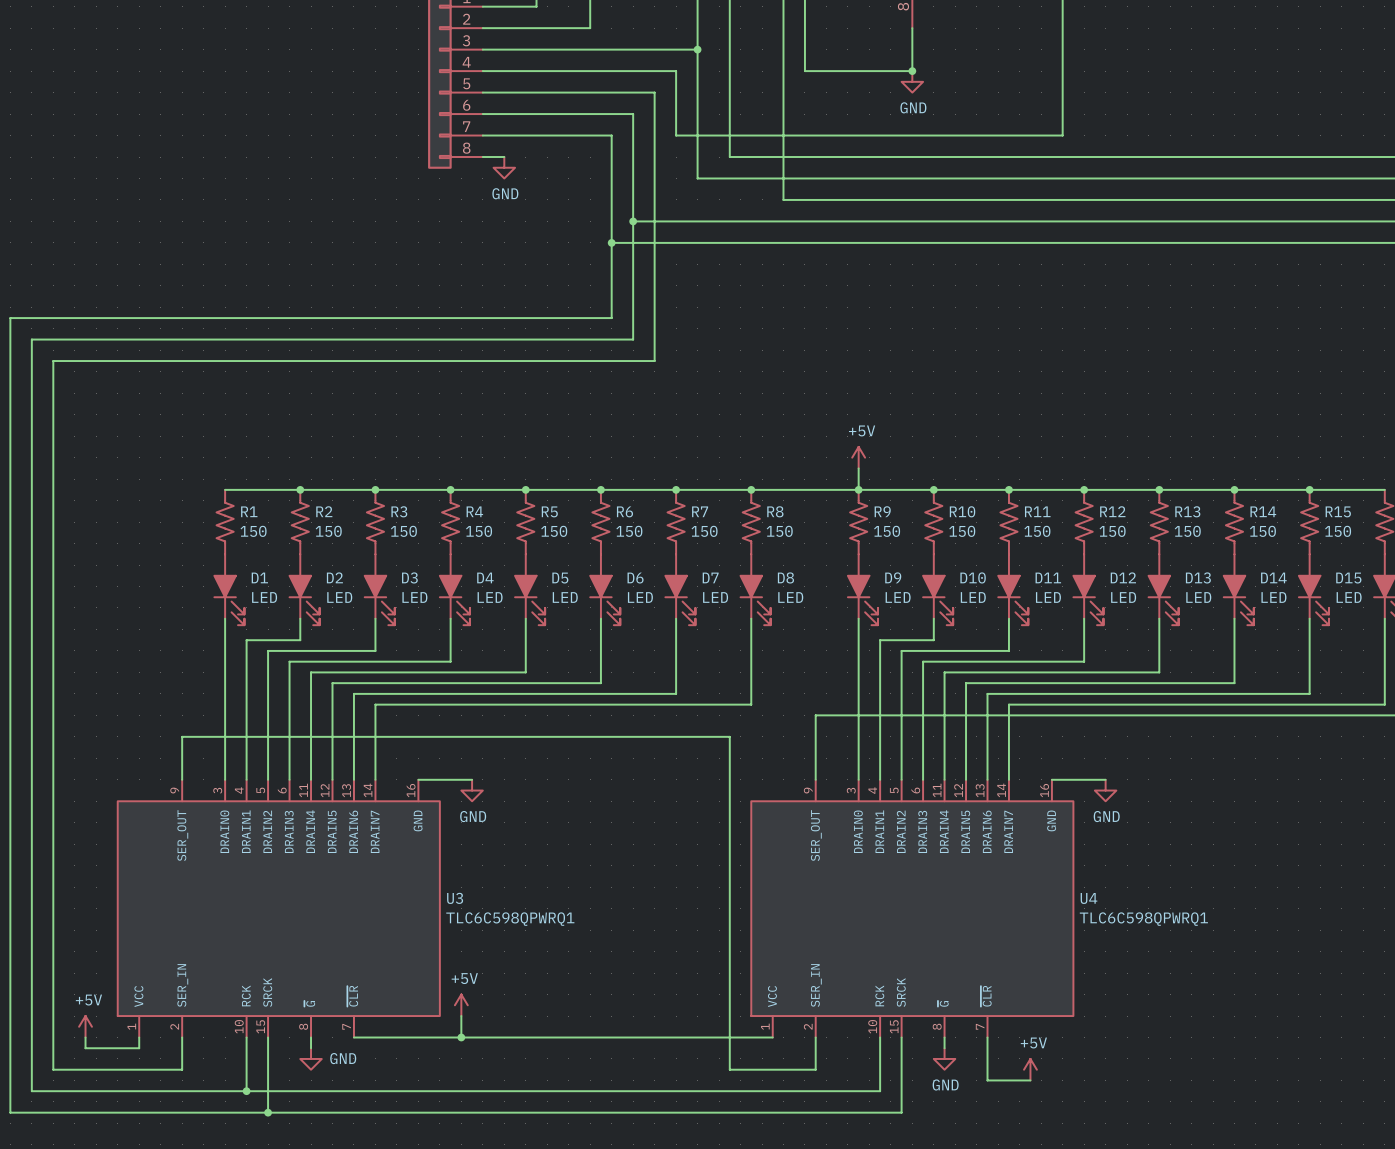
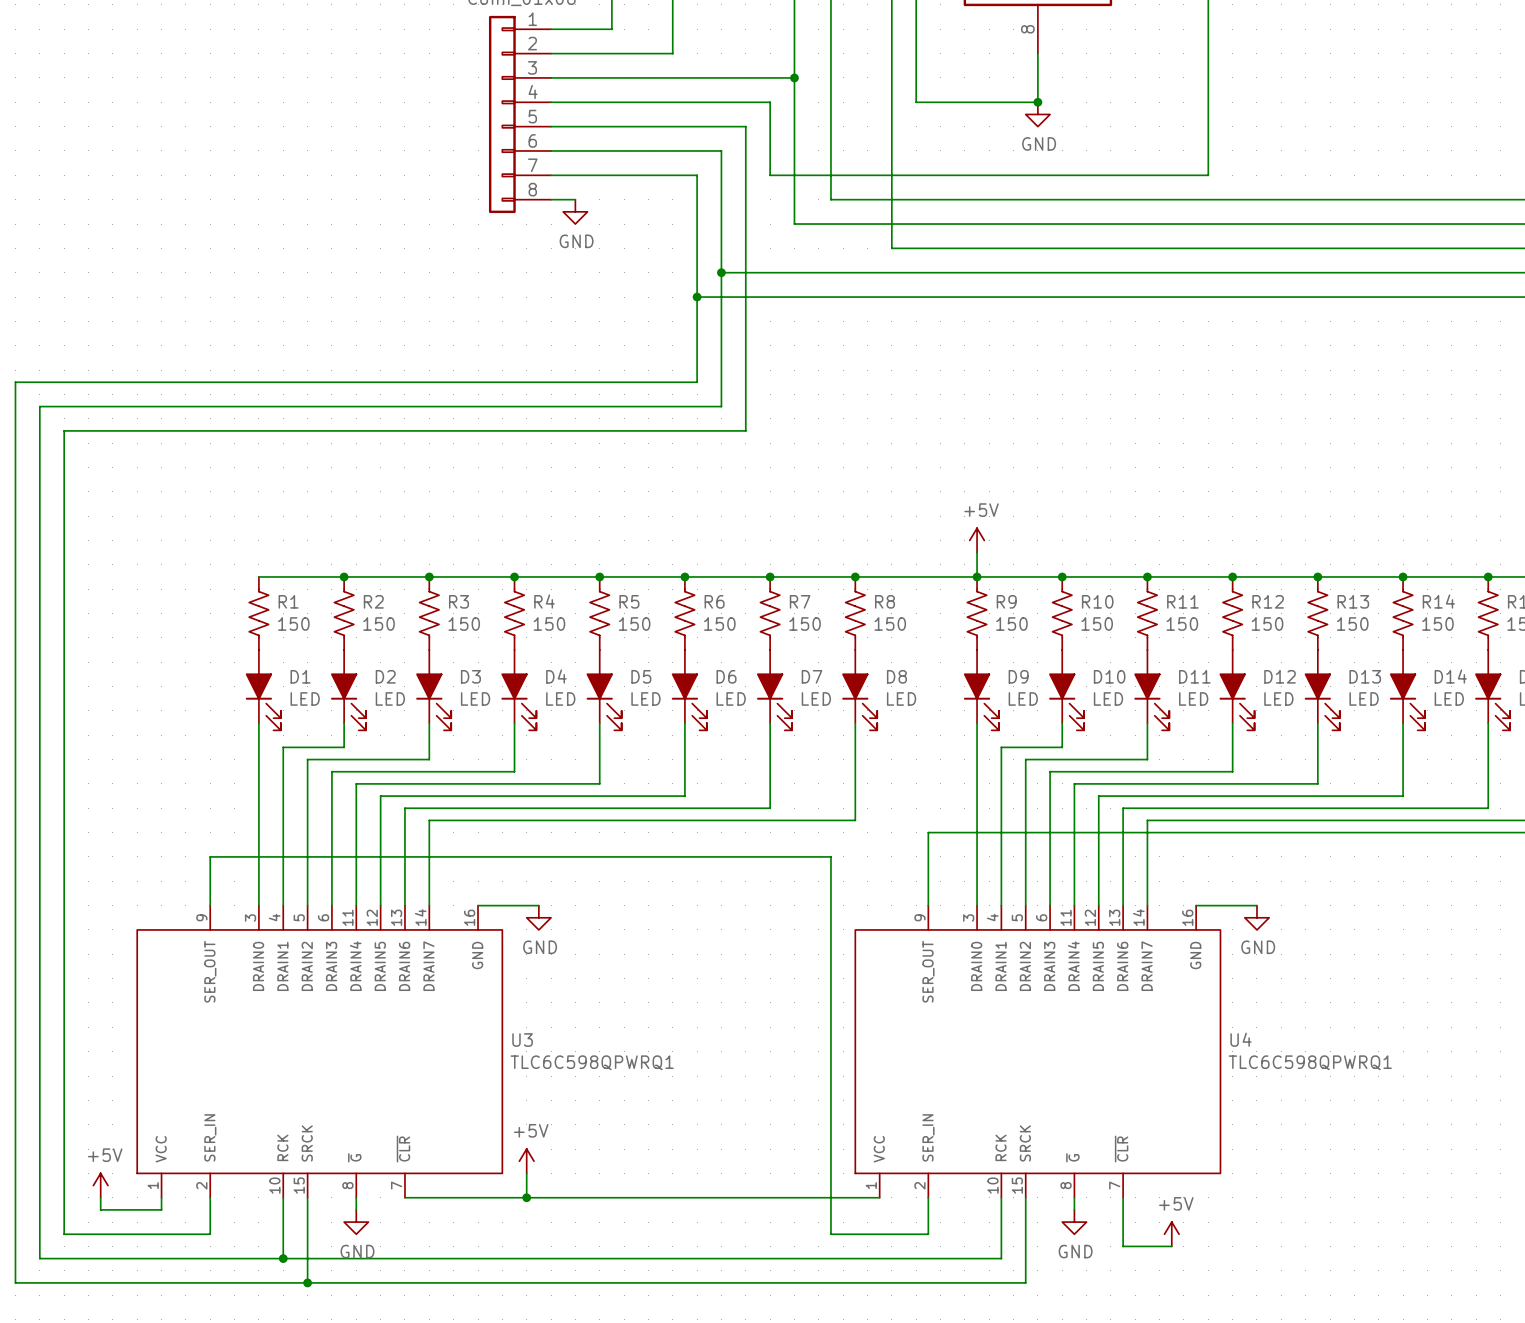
power symbol text position: GND (343, 1058) -> GND (357, 1251)

